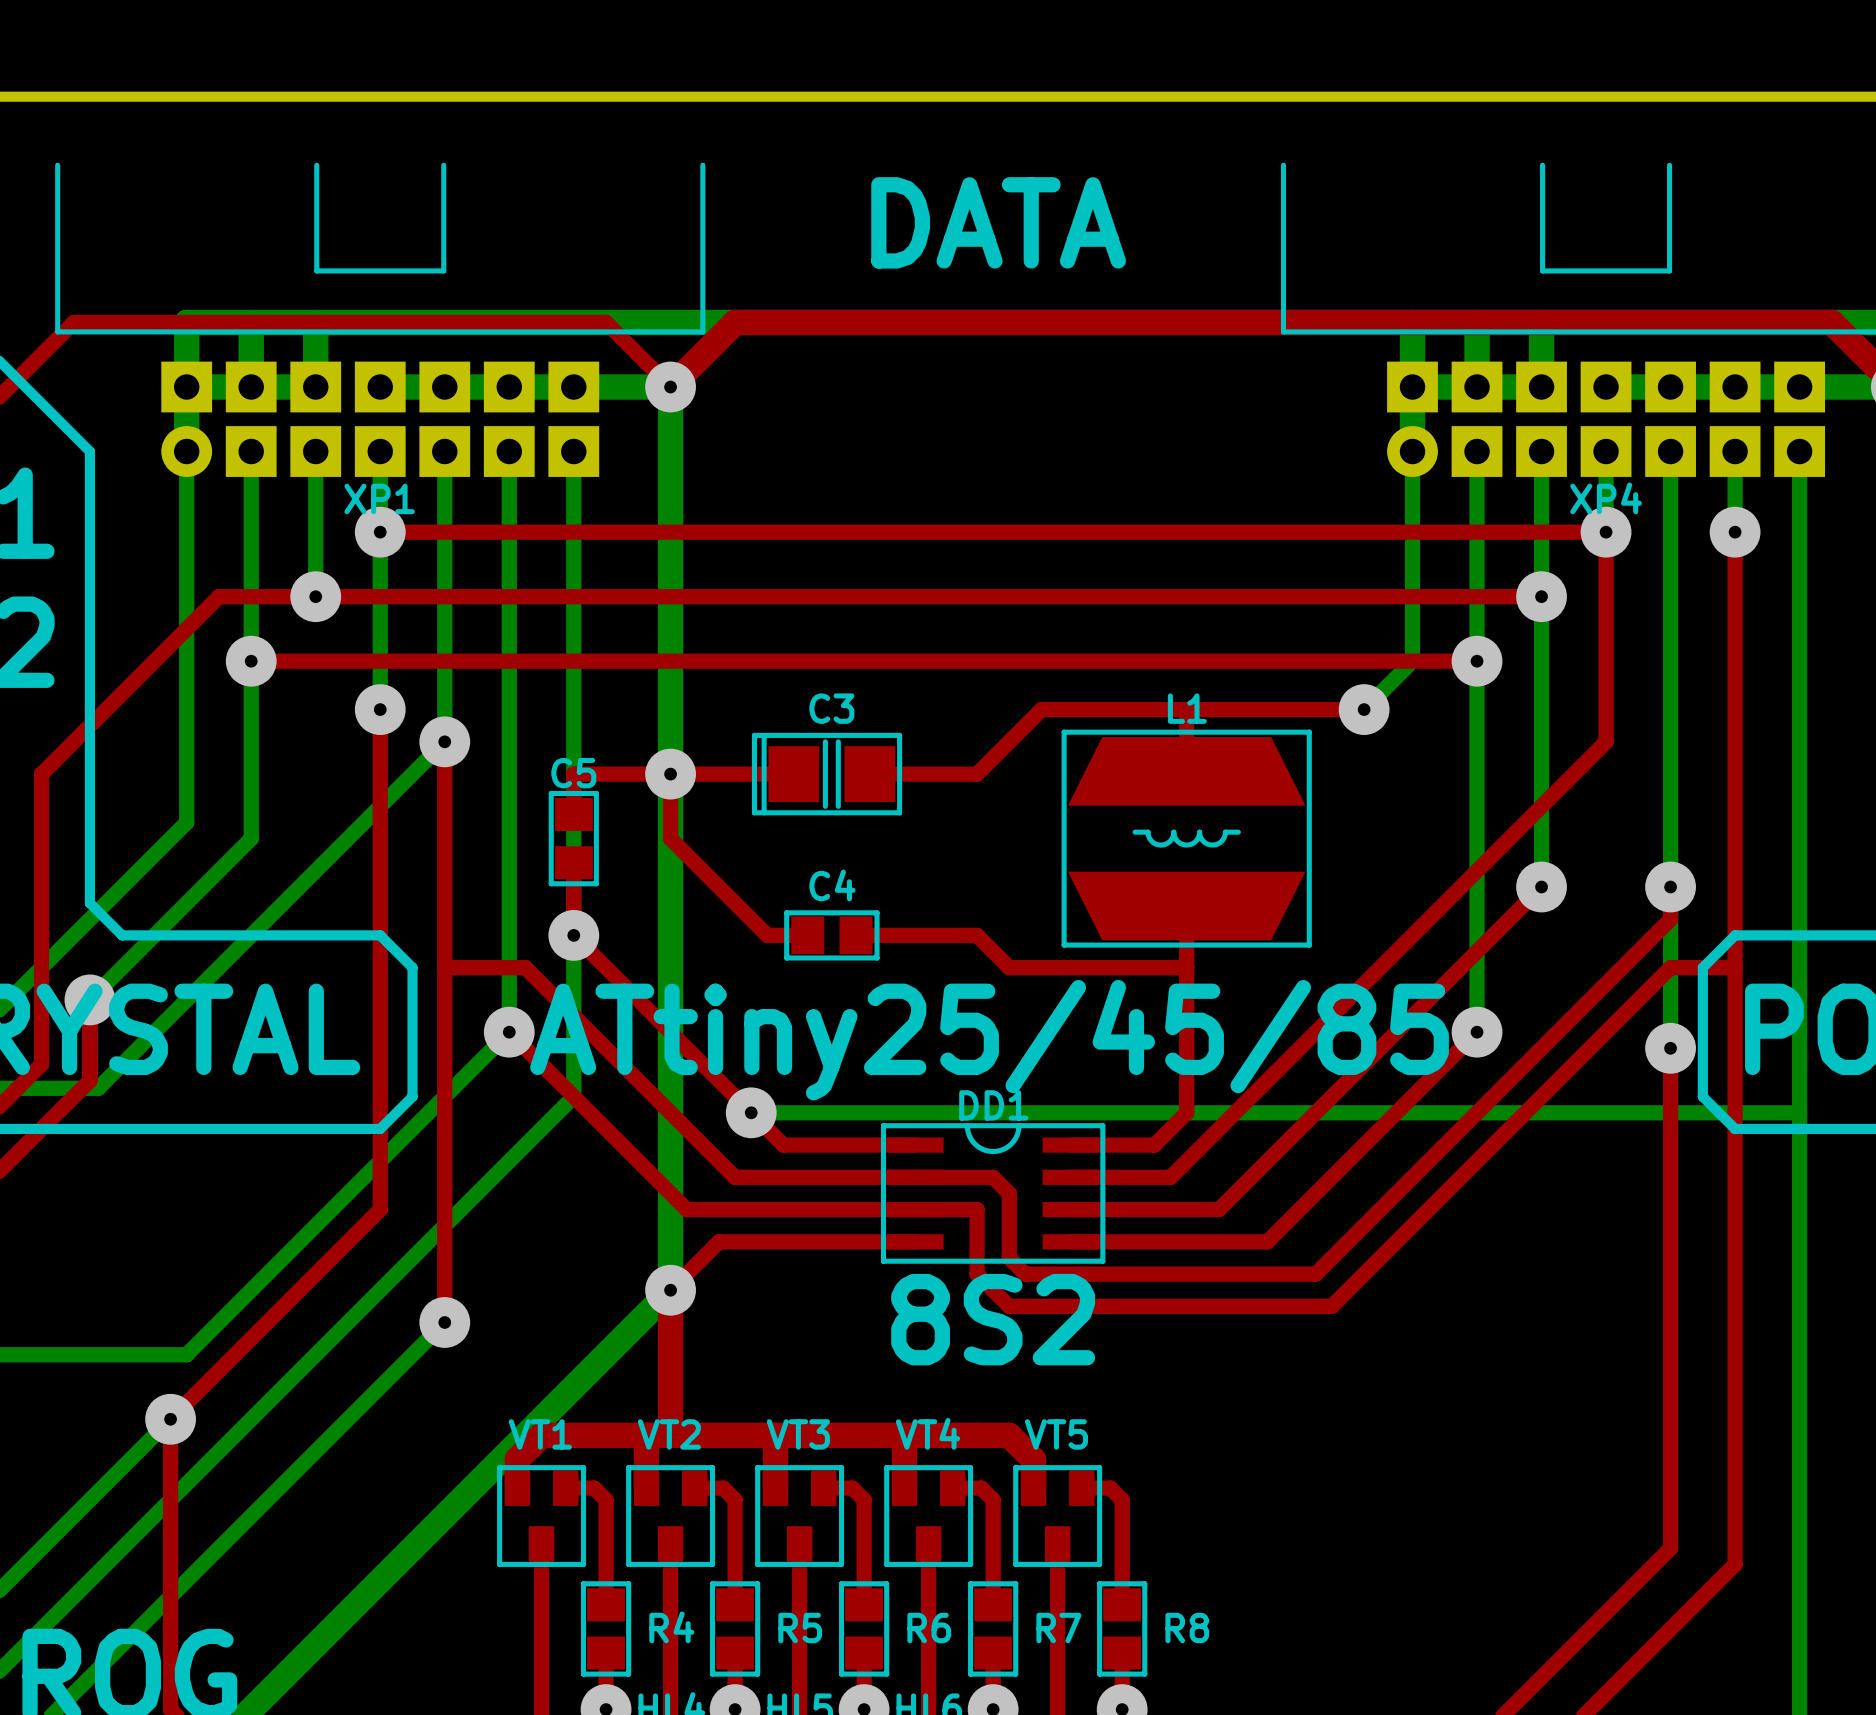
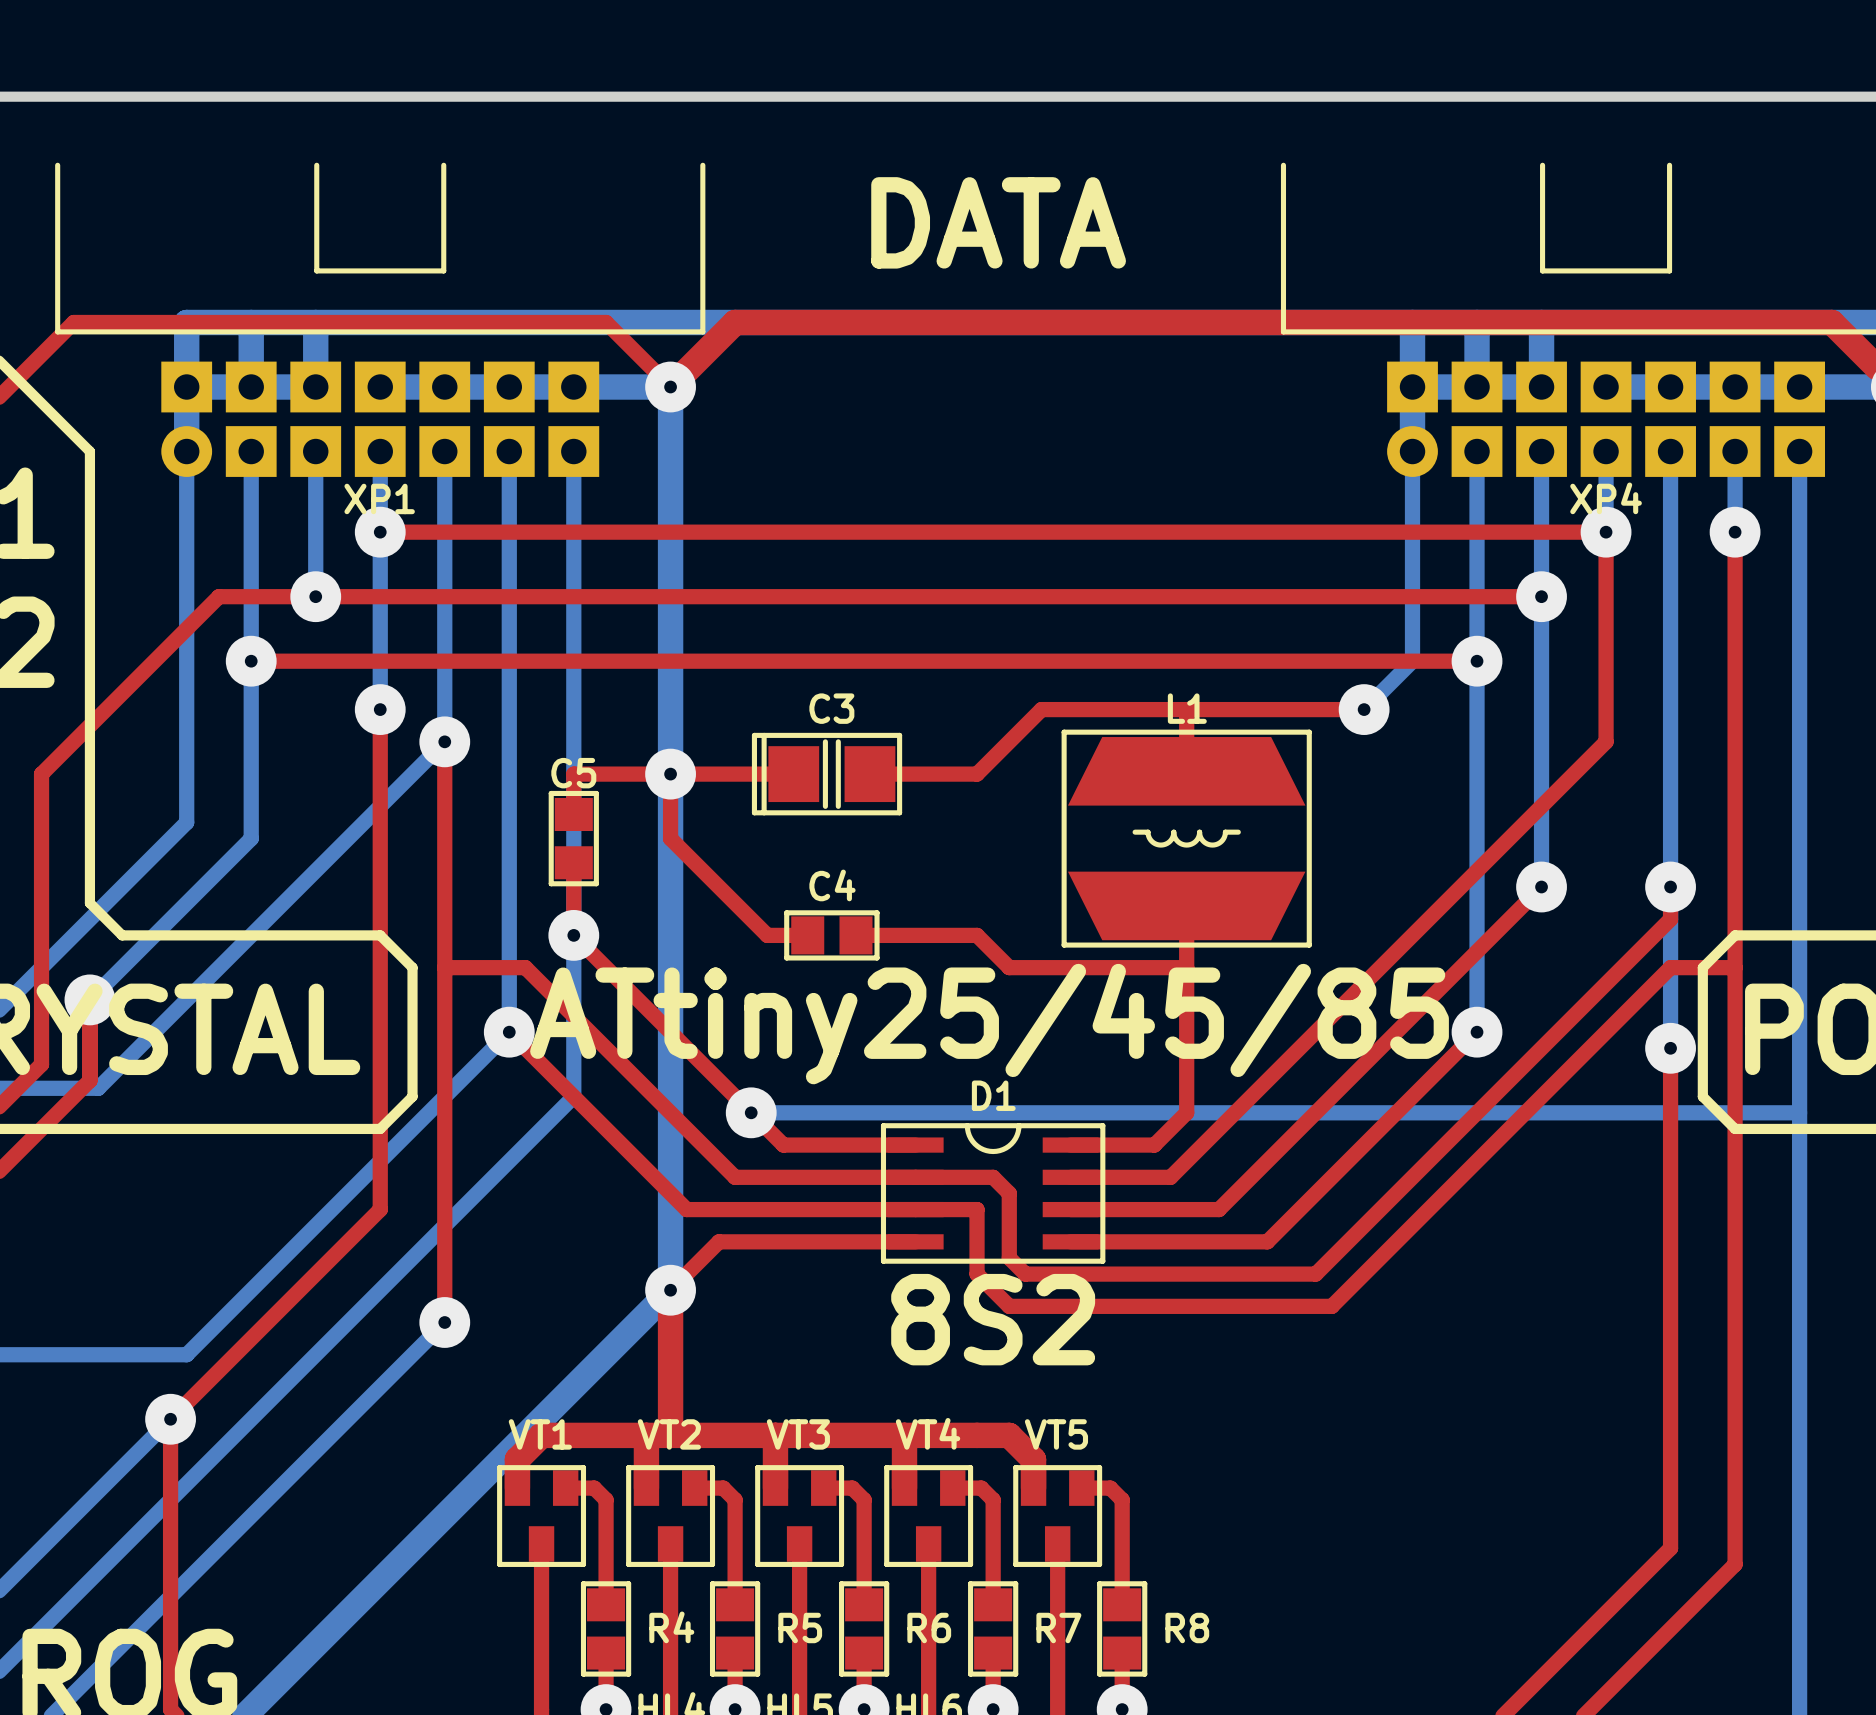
text position: ATtiny25/45/85 (989, 1040) -> ATtiny25/45/85 (989, 1024)
DD1 name: DD1 (993, 1105) -> D1 (993, 1095)

